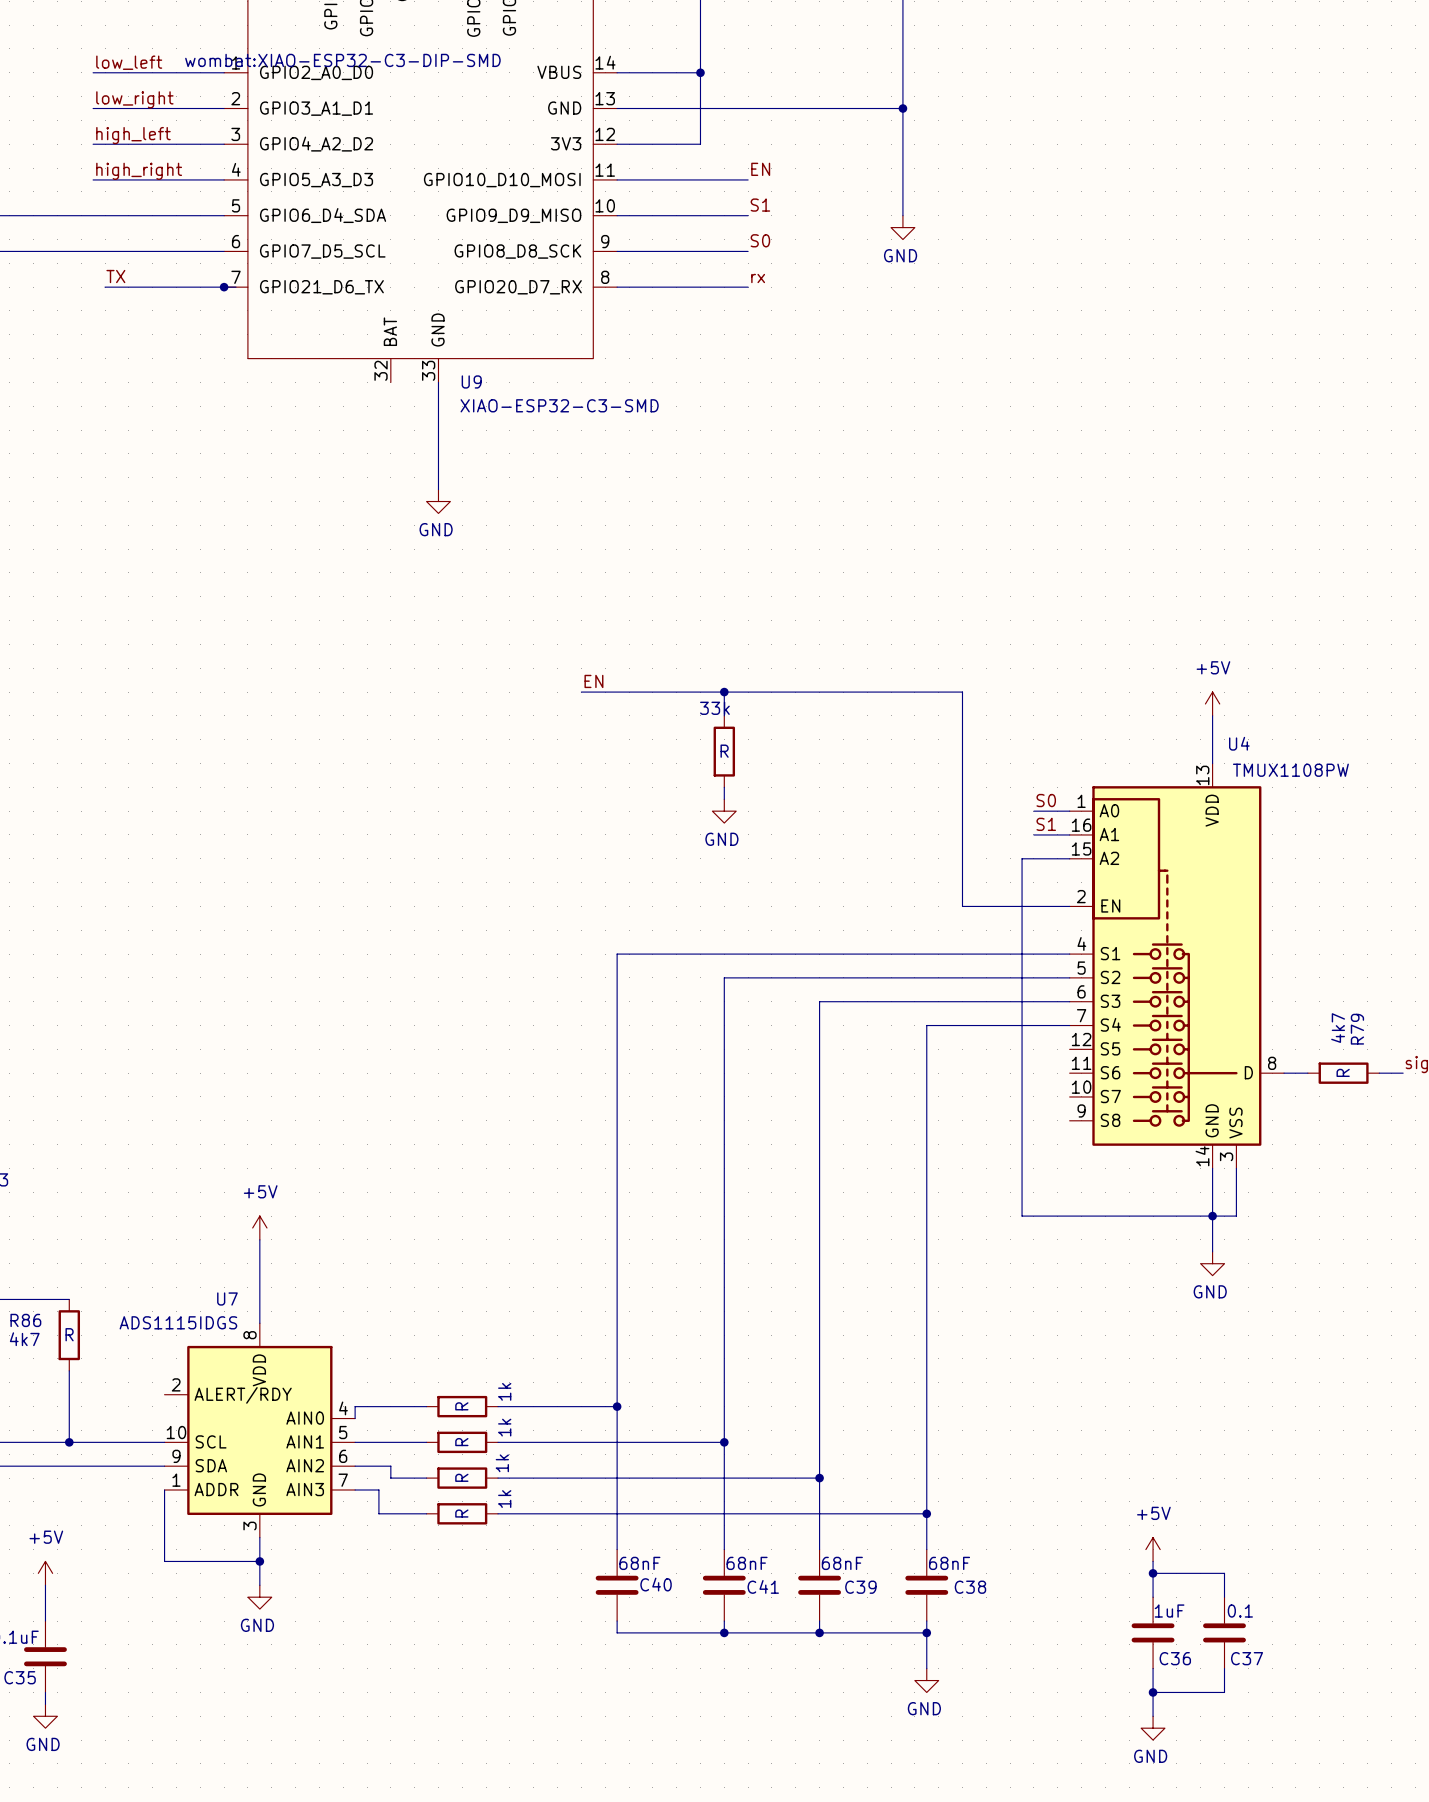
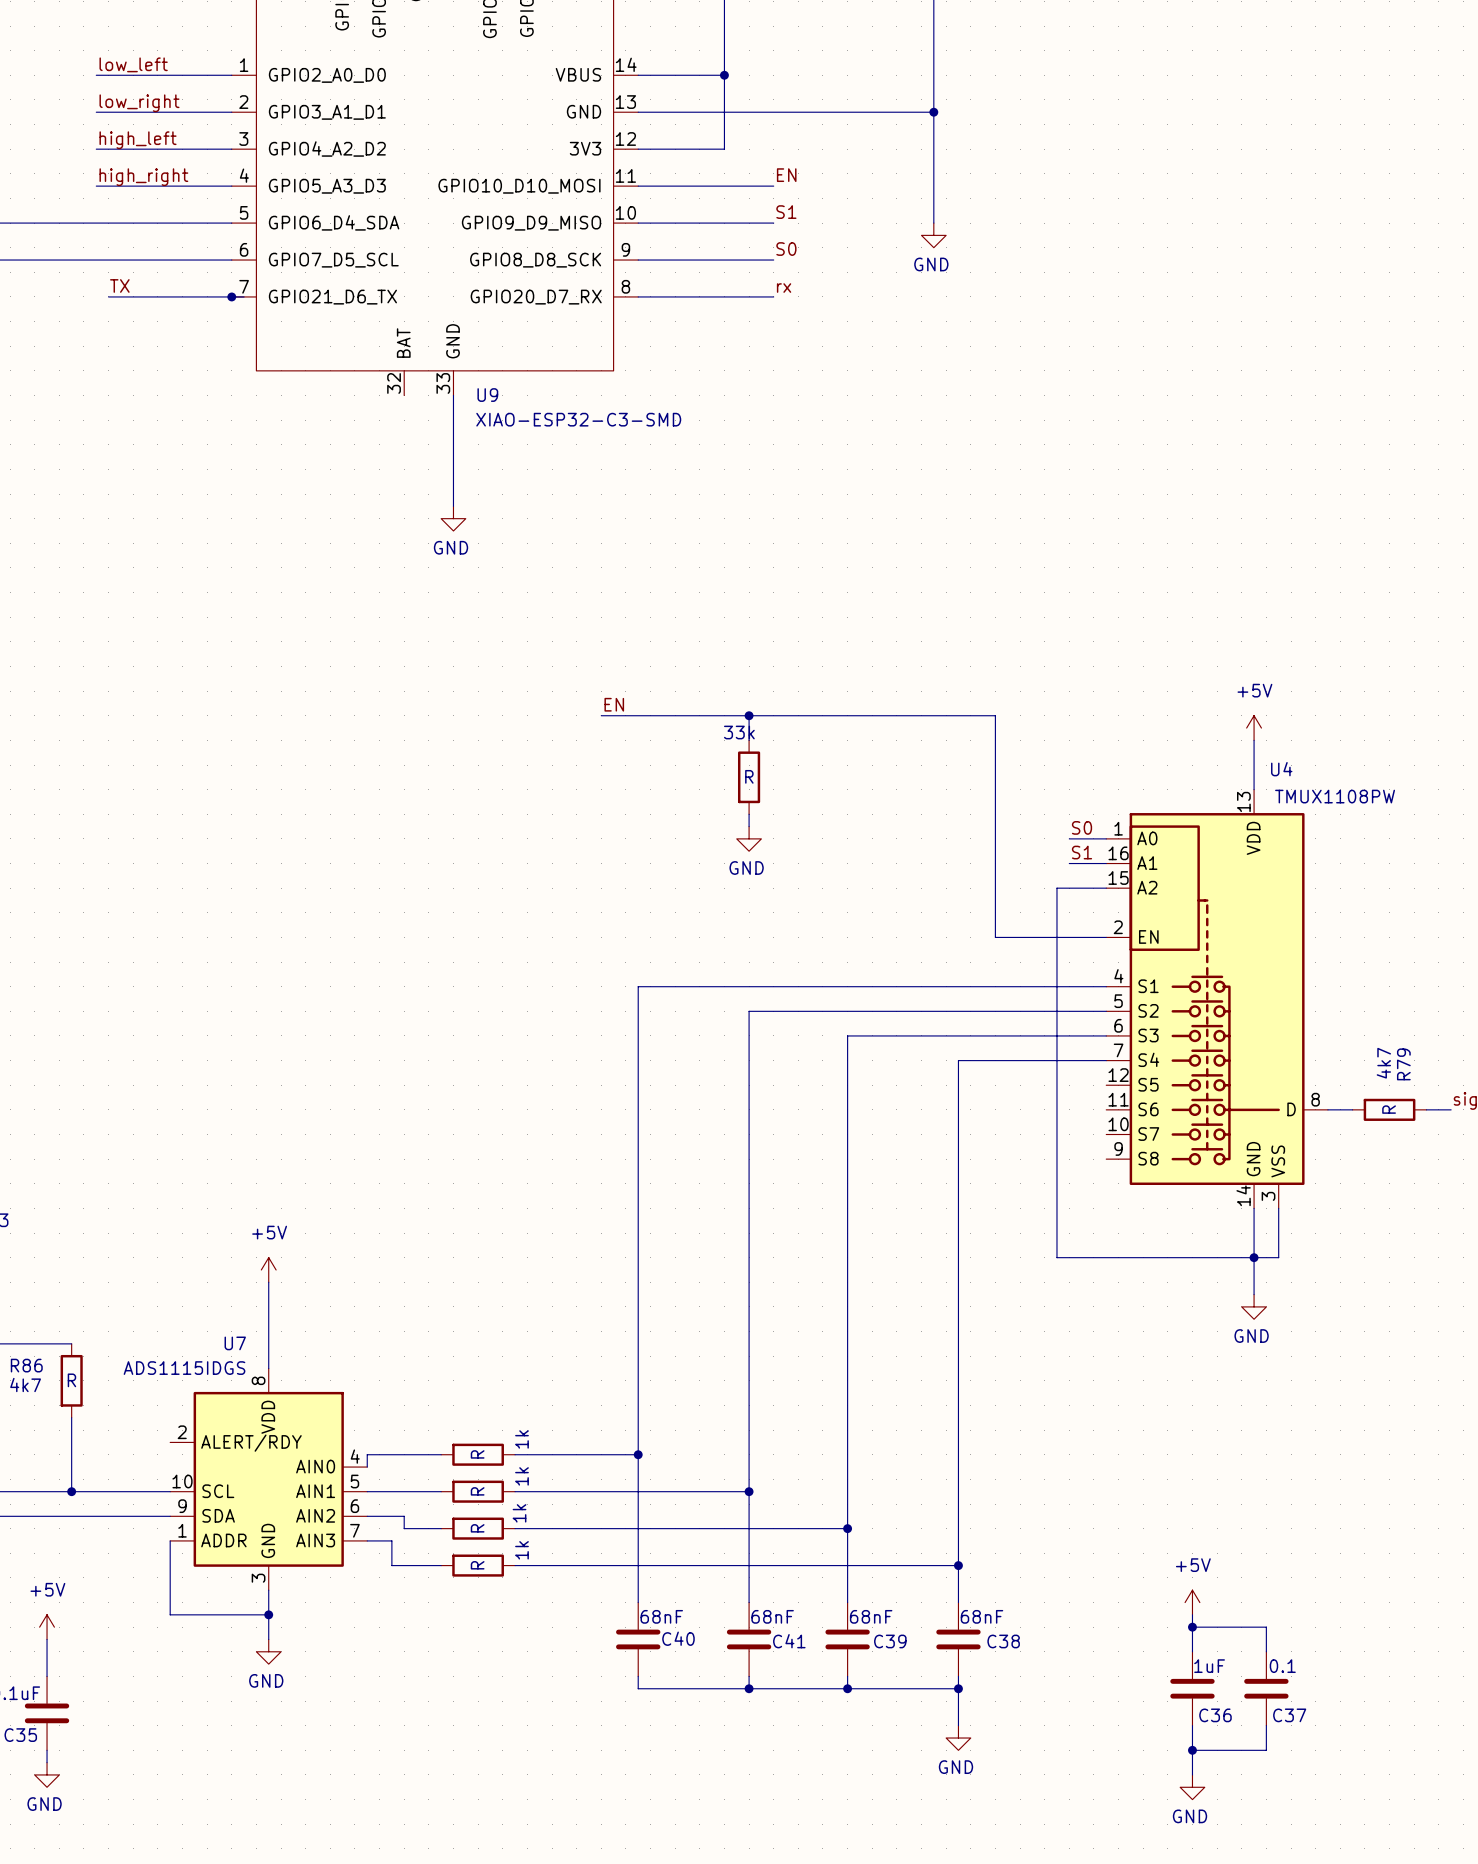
U9 text: wombat:XIAO-ESP32-C3-DIP-SMD (342, 60) -> none

